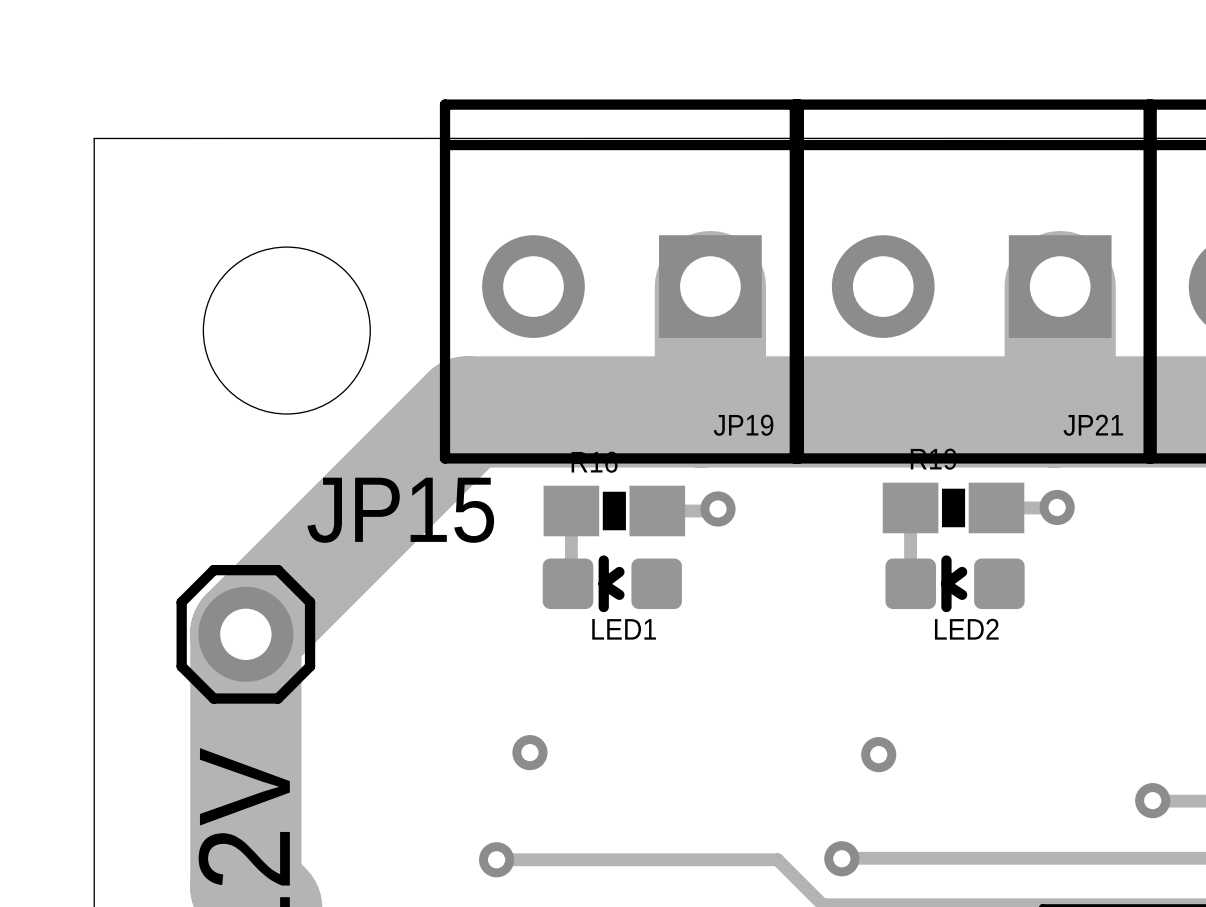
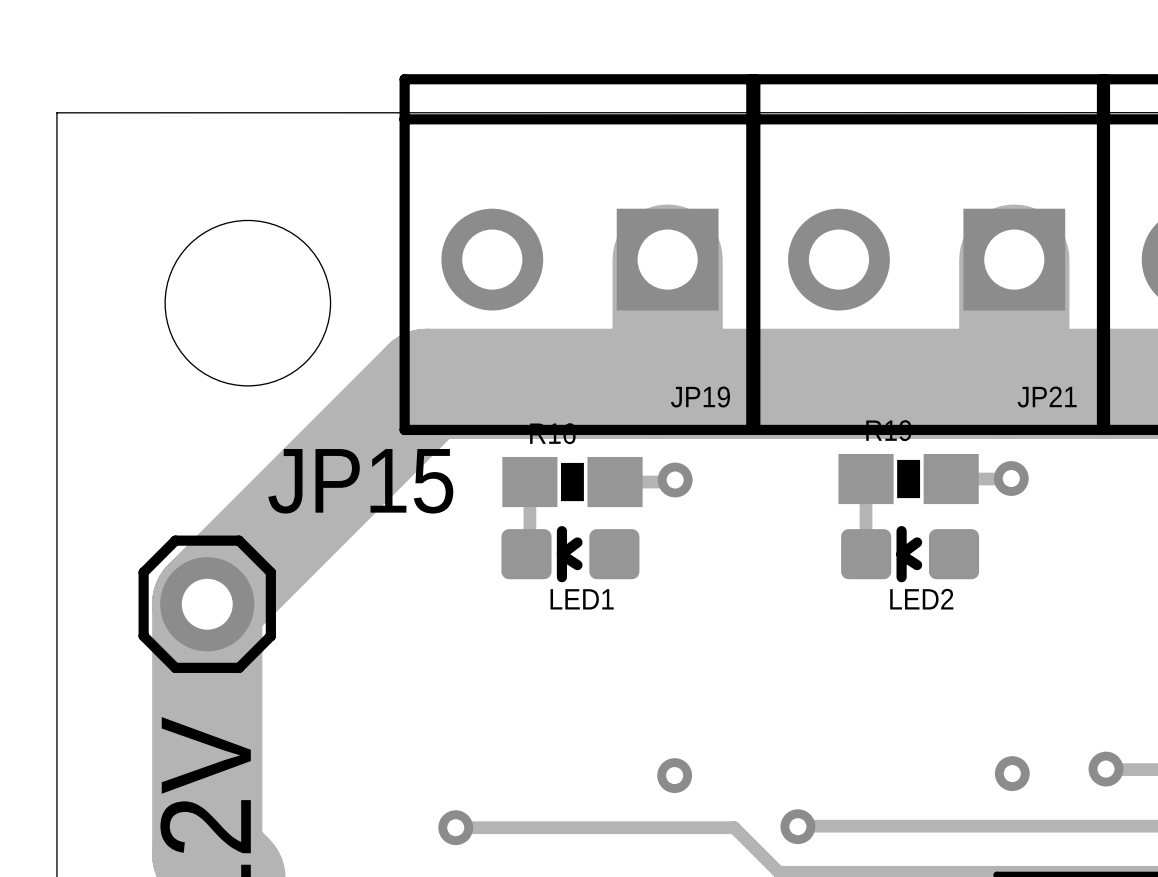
via: (529, 752) -> none
via: (878, 754) -> none
via: none -> (1012, 773)
via: none -> (674, 775)

